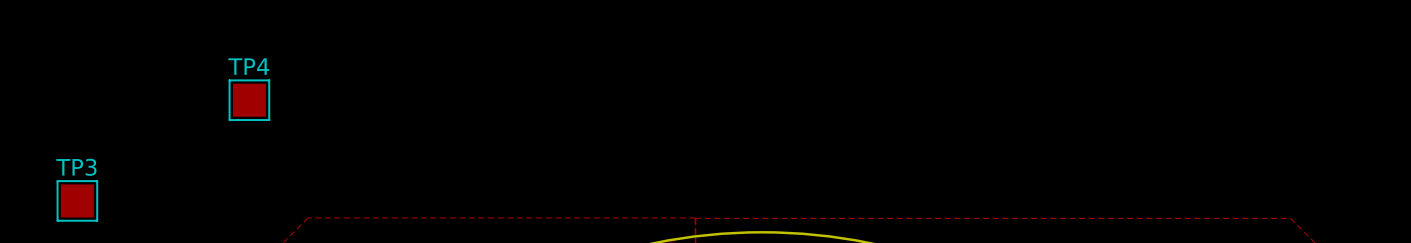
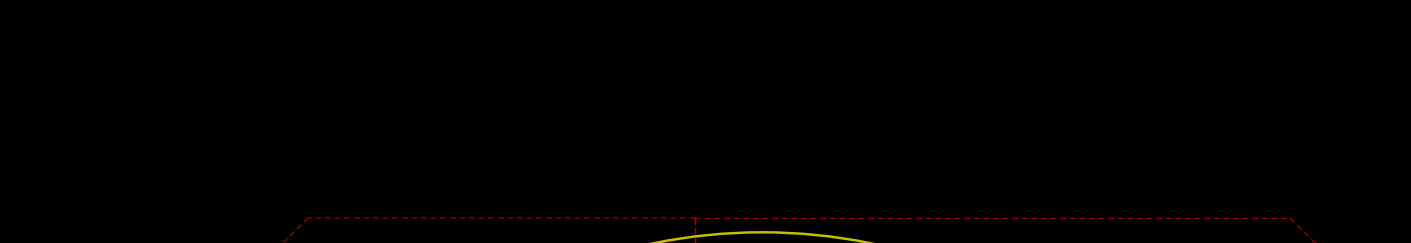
TP4: (249, 100) -> none
TP3: (77, 200) -> none

